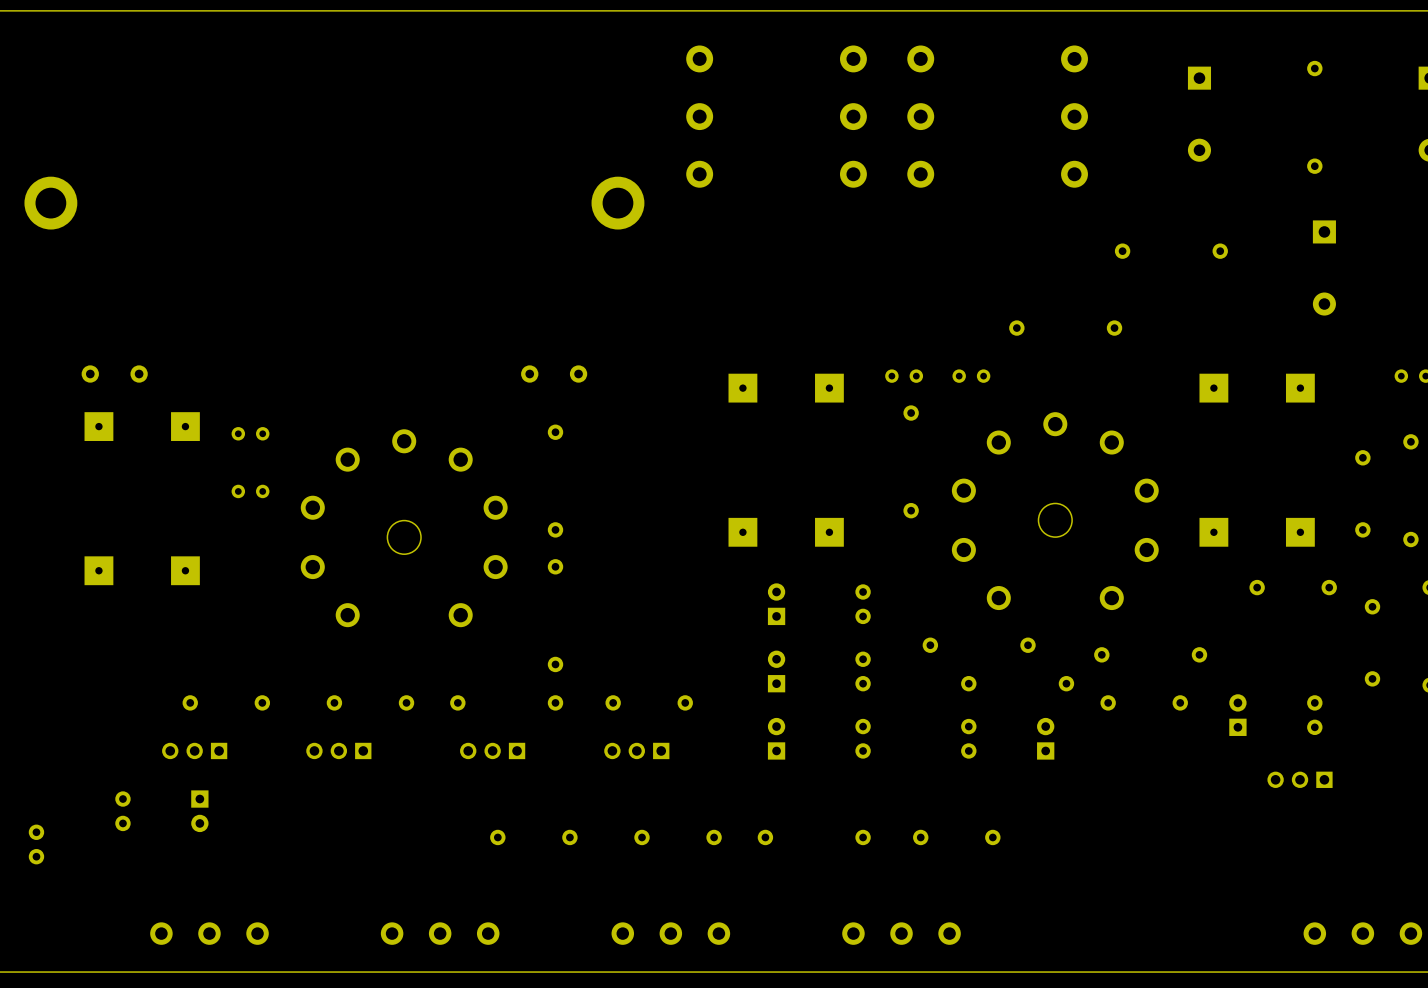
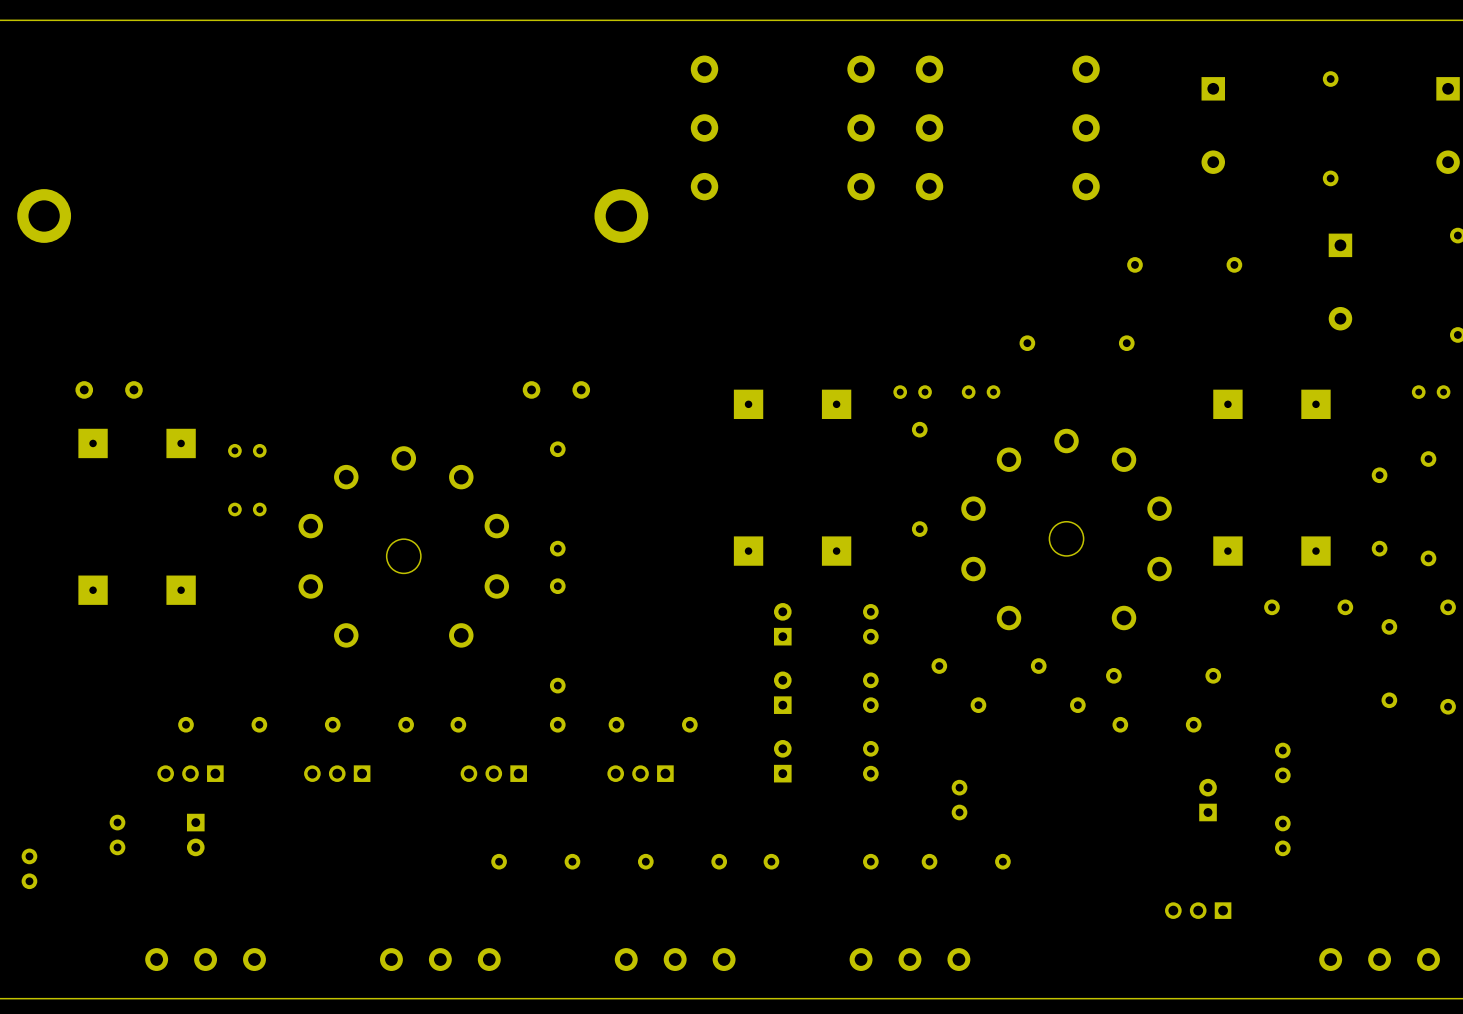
part position: (1237, 715) -> (1208, 800)
part position: (1314, 715) -> (1282, 762)
part position: (968, 738) -> (959, 800)
part: (1045, 738) -> none
part position: (1300, 779) -> (1198, 910)
part: none -> (1282, 835)

